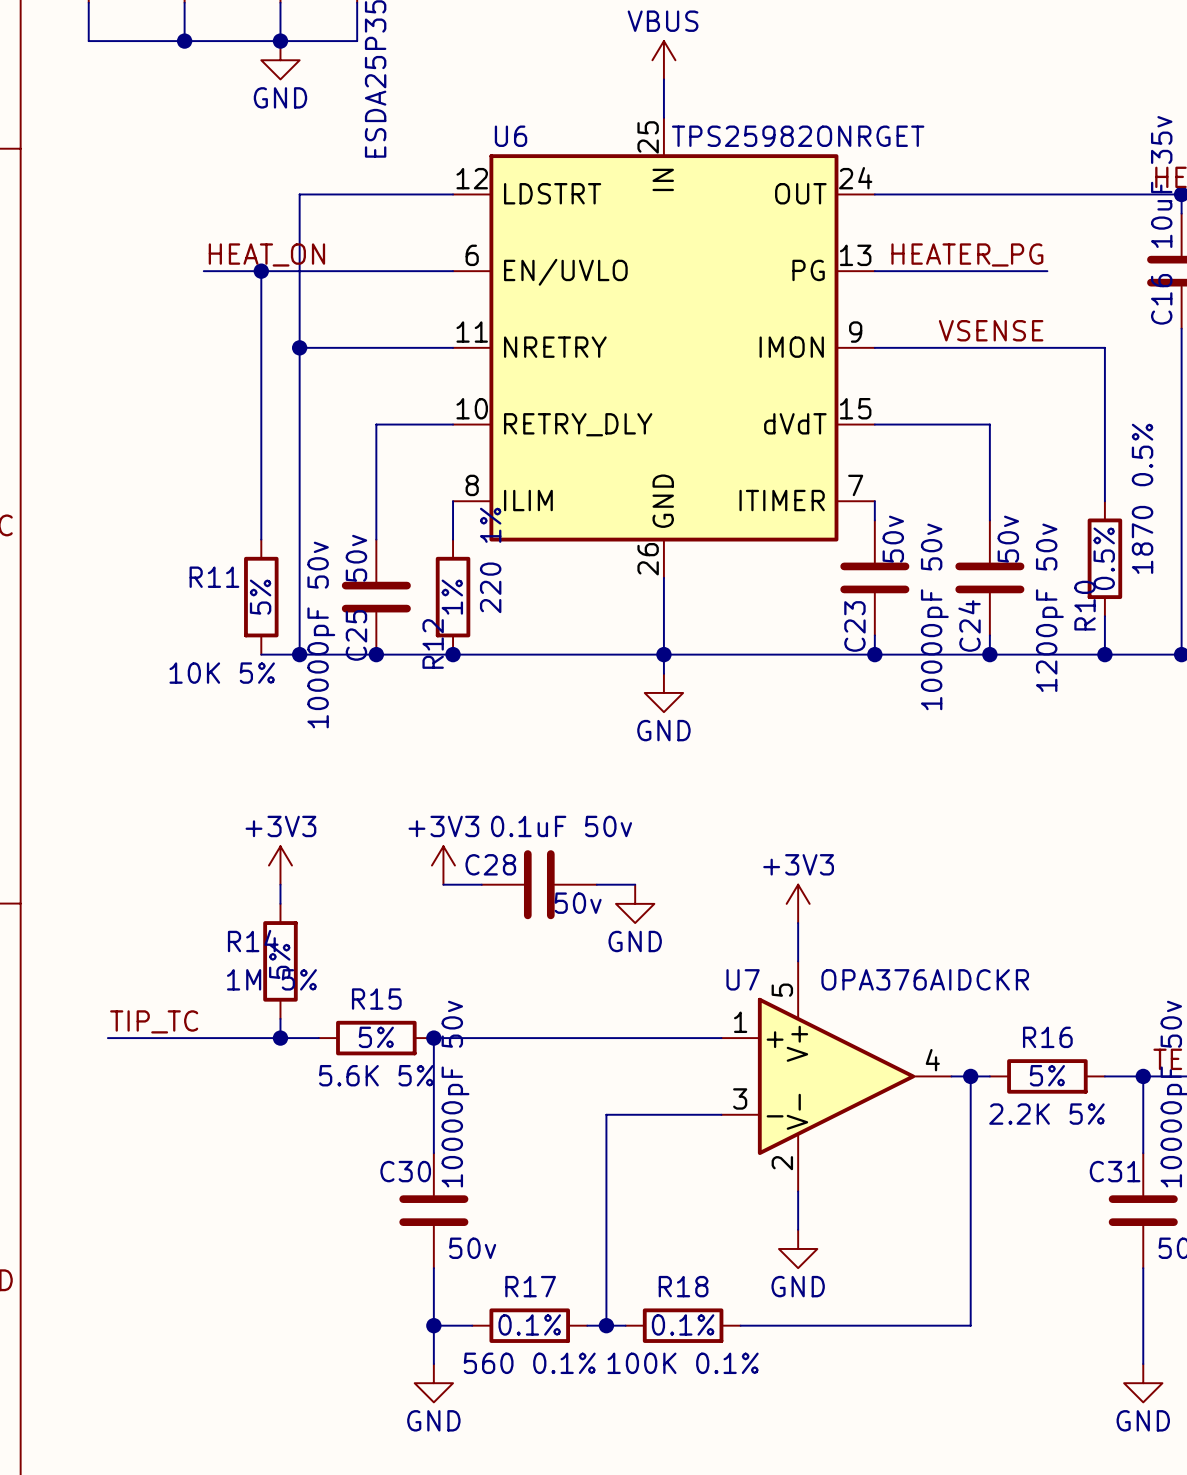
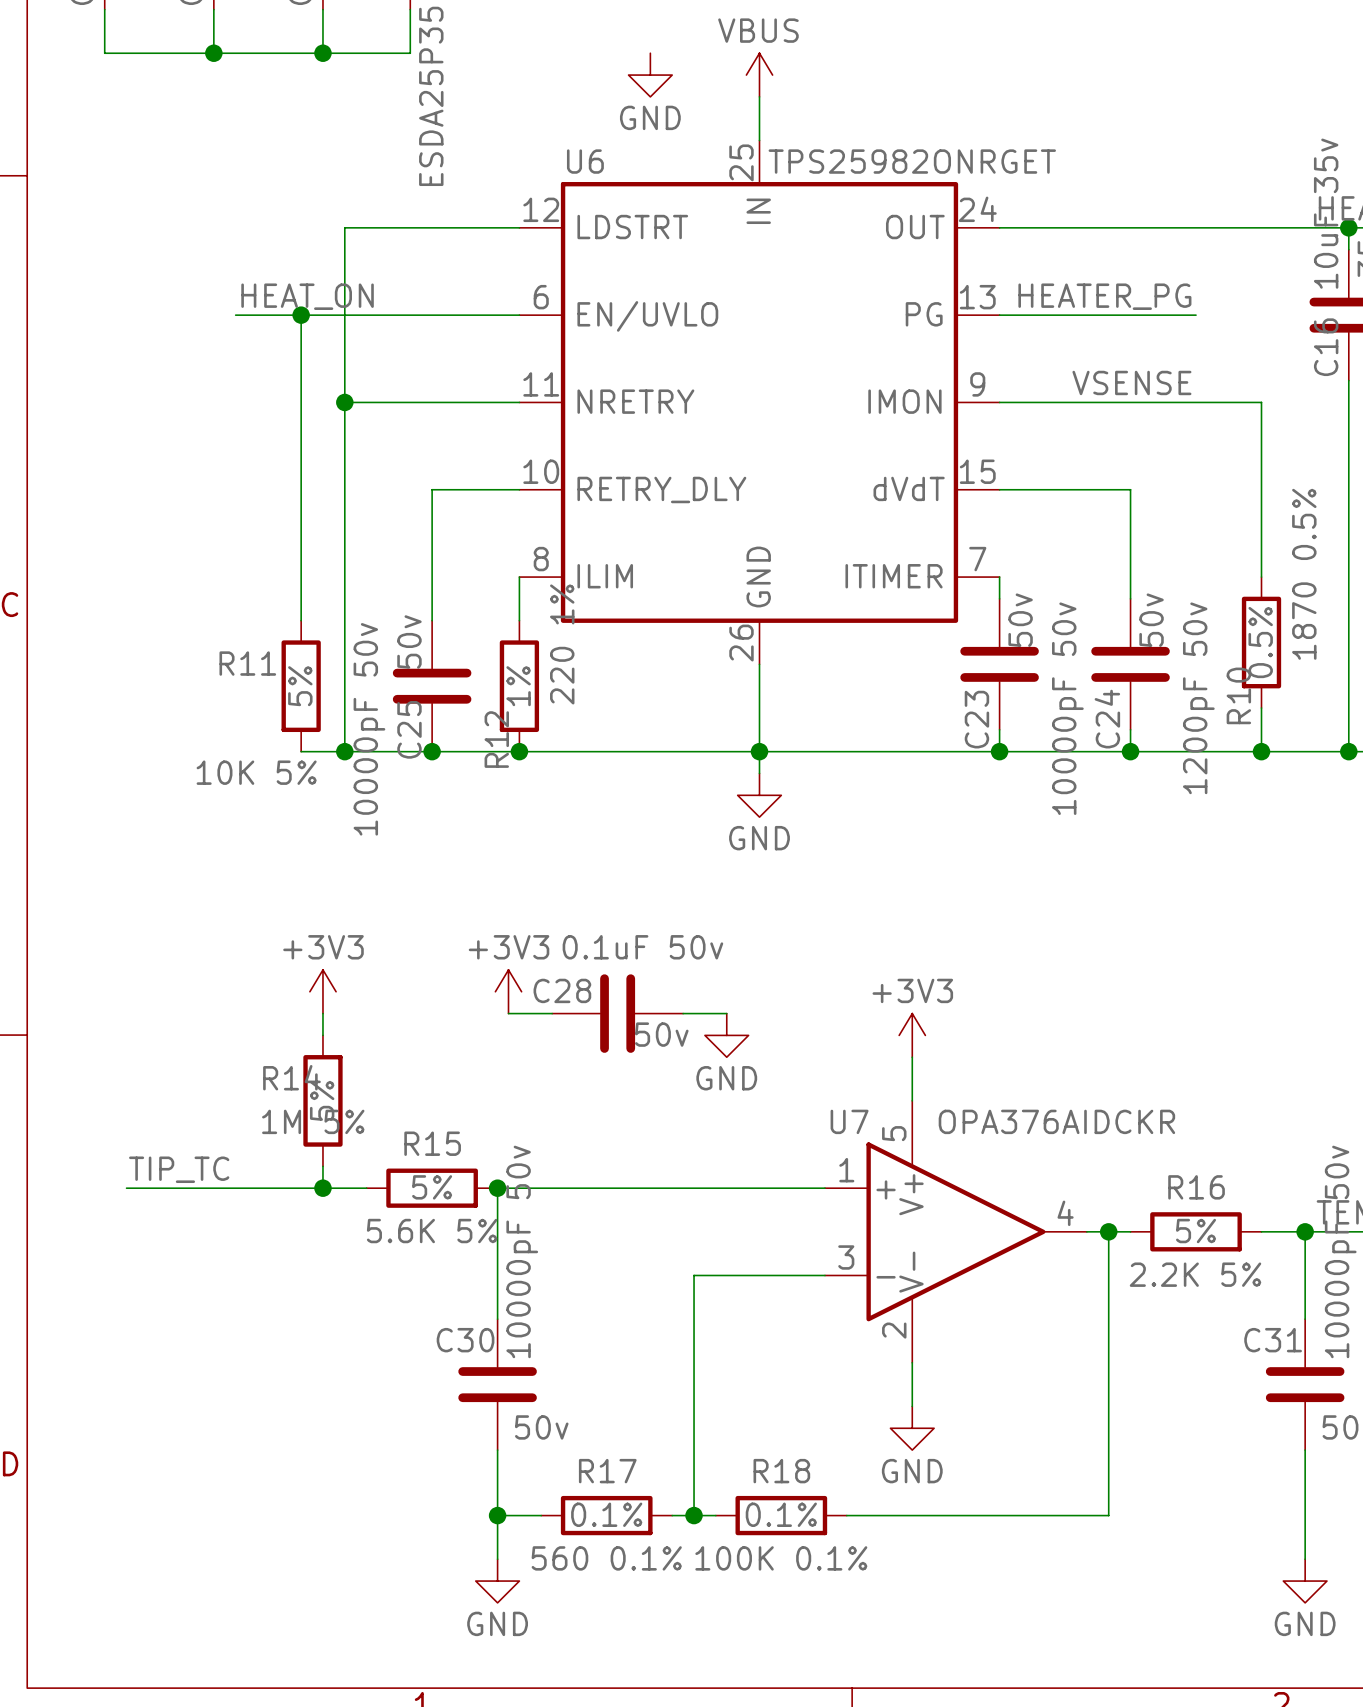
power symbol: GND (280, 60) -> none
power symbol: none -> GND (650, 75)

